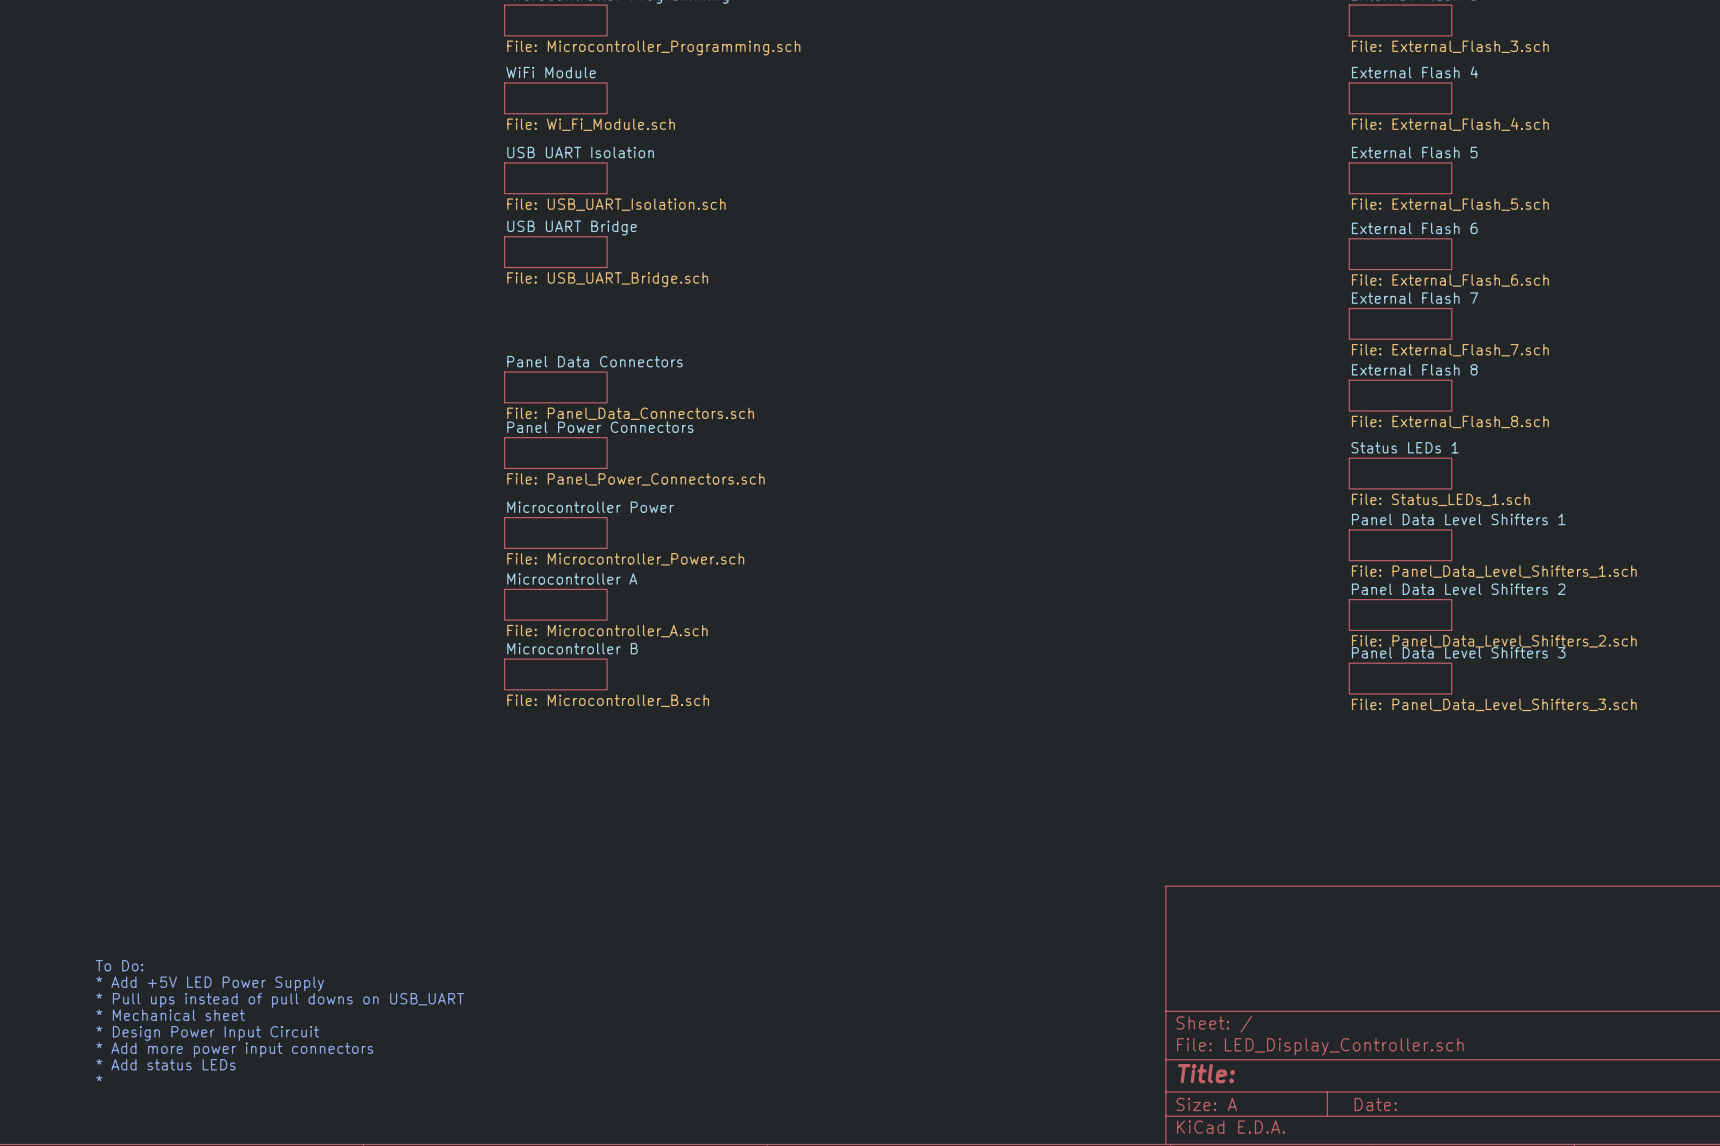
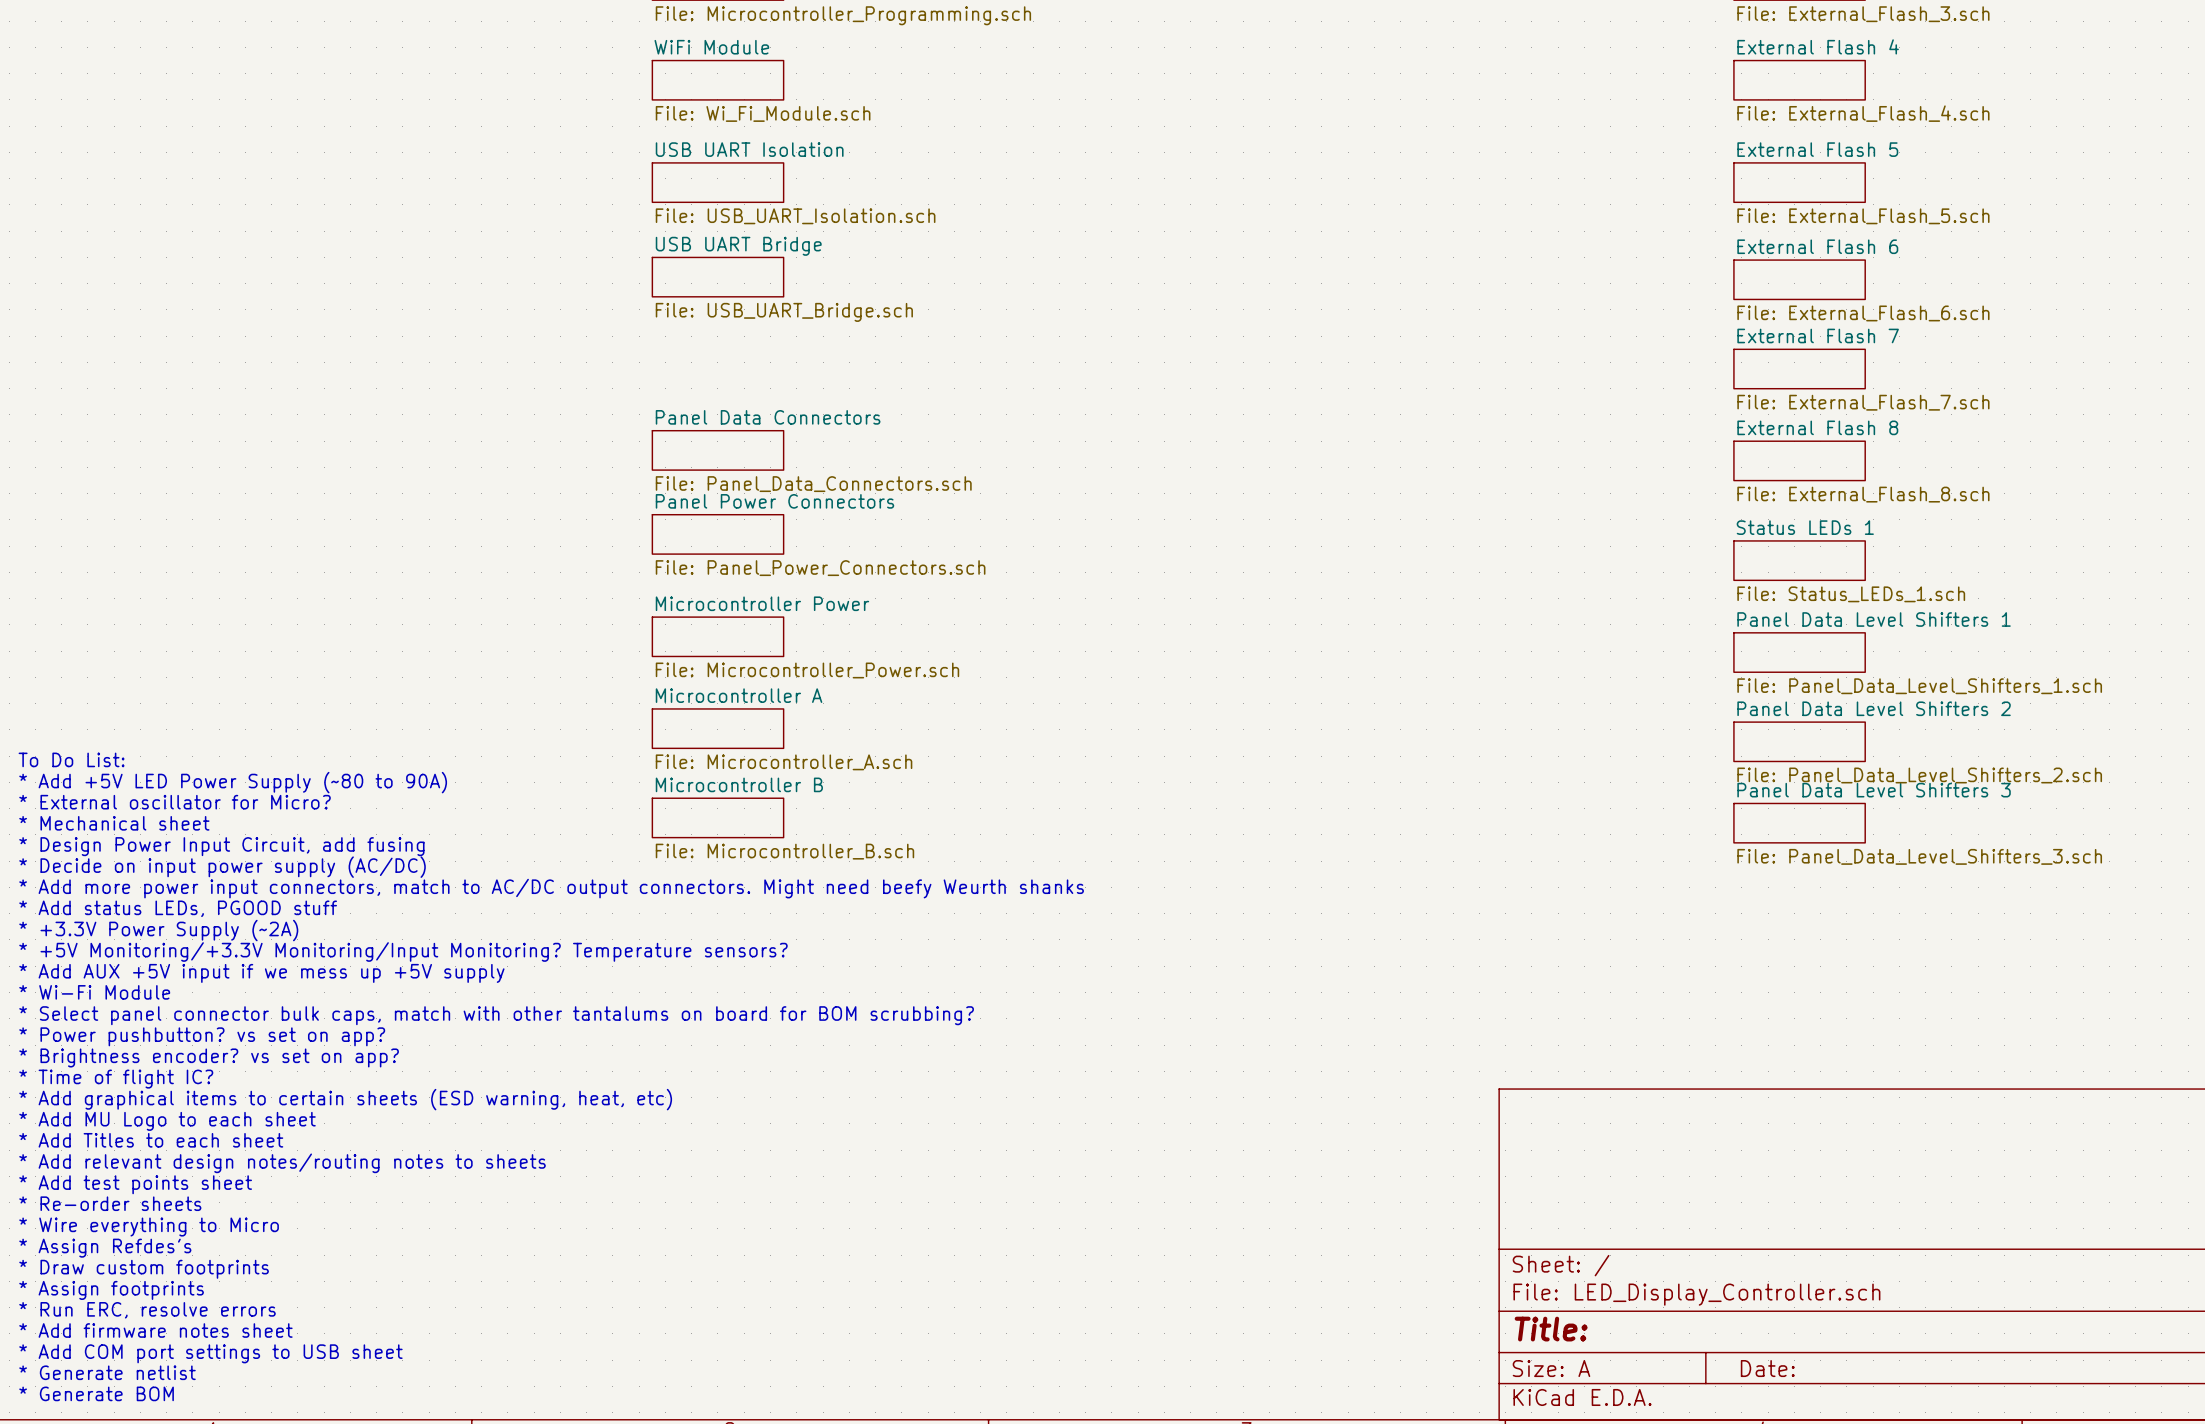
text: none -> To Do List: (71, 759)
text: none -> * Add +5V LED Power Supply (~80 to 90A) (233, 782)
text: none -> * External oscillator for Micro? (174, 802)
text: none -> * Mechanical sheet (114, 823)
text: none -> * Design Power Input Circuit, add fusing (221, 846)
text: none -> * Decide on input power supply (AC/DC) (222, 867)
text: none -> * Add more power input connectors, match to AC/DC output connectors. Might need beefy Weurth shanks (551, 888)
text: none -> * Add status LEDs, PGOOD stuff (178, 908)
text: none -> * +3.3V Power Supply (~2A) (158, 930)
text: none -> * +5V Monitoring/+3.3V Monitoring/Input Monitoring? Temperature sensors? (403, 951)
text: none -> * Add AUX +5V input if we mess up +5V supply (261, 973)
text: none -> * Wi-Fi Module (94, 992)
text: none -> * Select panel connector bulk caps, match with other tantalums on board for BOM scrubbing? (496, 1015)
text: none -> * Power pushbutton? vs set on app? (202, 1036)
text: none -> * Brightness encoder? vs set on app? (209, 1057)
text: none -> * Time of flight IC? (116, 1079)
text: none -> * Add graphical items to certain sheets (ESD warning, heat, etc) (345, 1099)
text: none -> * Add MU Logo to each sheet (167, 1121)
text: none -> * Add Titles to each sheet (151, 1140)
text: none -> * Add relevant design notes/routing notes to sheets (282, 1163)
text: none -> * Add test points sheet (135, 1184)
text: To Do: (119, 965) -> none
text: none -> * Re-order sheets (110, 1203)
text: * Add +5V LED Power Supply (210, 983) -> none
text: none -> * Wire everything to Micro (149, 1227)
text: * Pull ups instead of pull downs on USB_UART (280, 1000) -> none
text: none -> * Assign Refdes's (105, 1248)
text: * Mechanical sheet (170, 1015) -> none
text: none -> * Draw custom footprints (144, 1269)
text: * Design Power Input Circuit (207, 1033) -> none
text: none -> * Assign footprints (111, 1290)
text: * Add more power input connectors (234, 1049) -> none
text: none -> * Run ERC, resolve errors (147, 1310)
text: * Add status LEDs (165, 1064) -> none
text: none -> * Add firmware notes sheet (155, 1330)
text: * (99, 1078) -> none
text: none -> * Add COM port settings to USB sheet (210, 1353)
text: none -> * Generate netlist (107, 1372)
text: none -> * Generate BOM (96, 1393)

